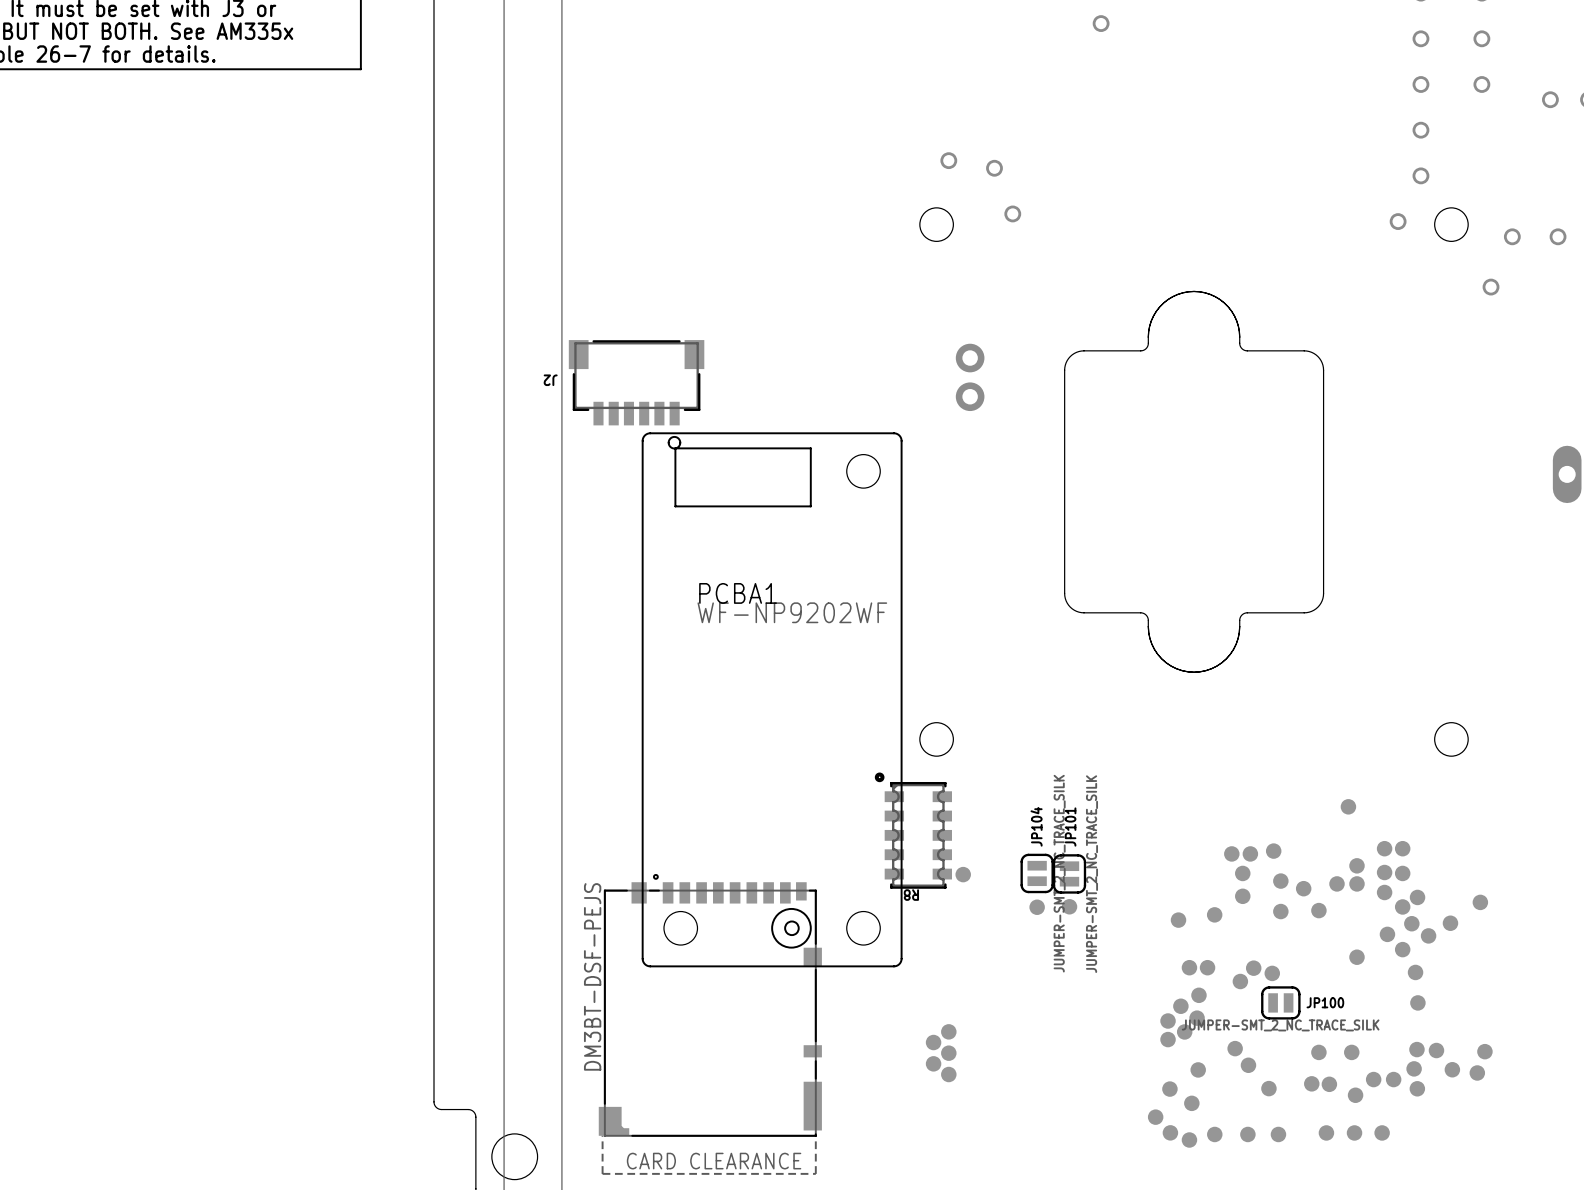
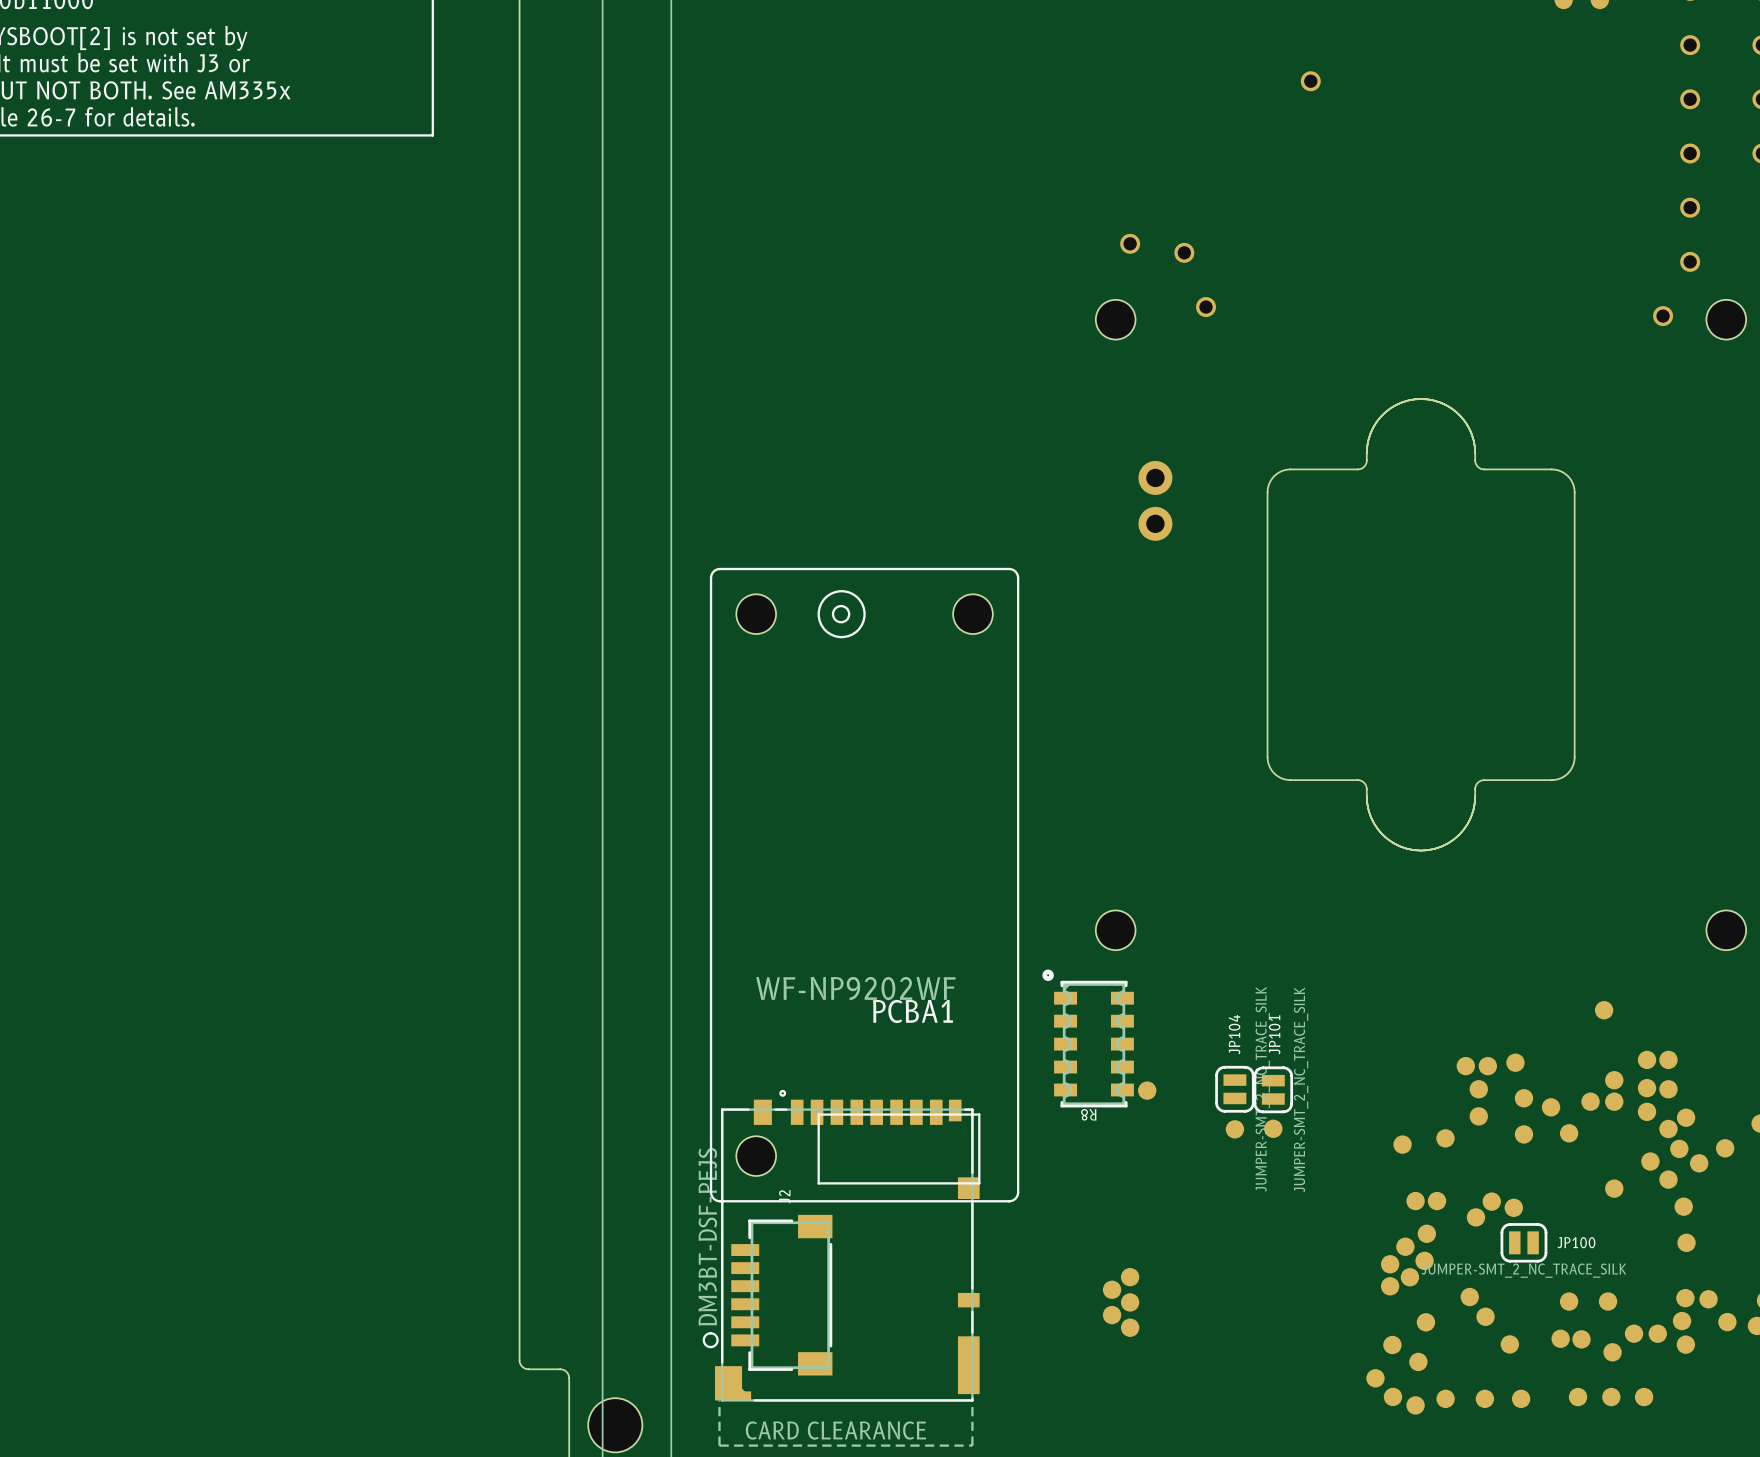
J2 rotation: 0° (636, 394) -> 90° clockwise (767, 1295)
J2 position: (636, 394) -> (767, 1295)
PCBA1 rotation: 0° (772, 699) -> 180° (864, 885)

